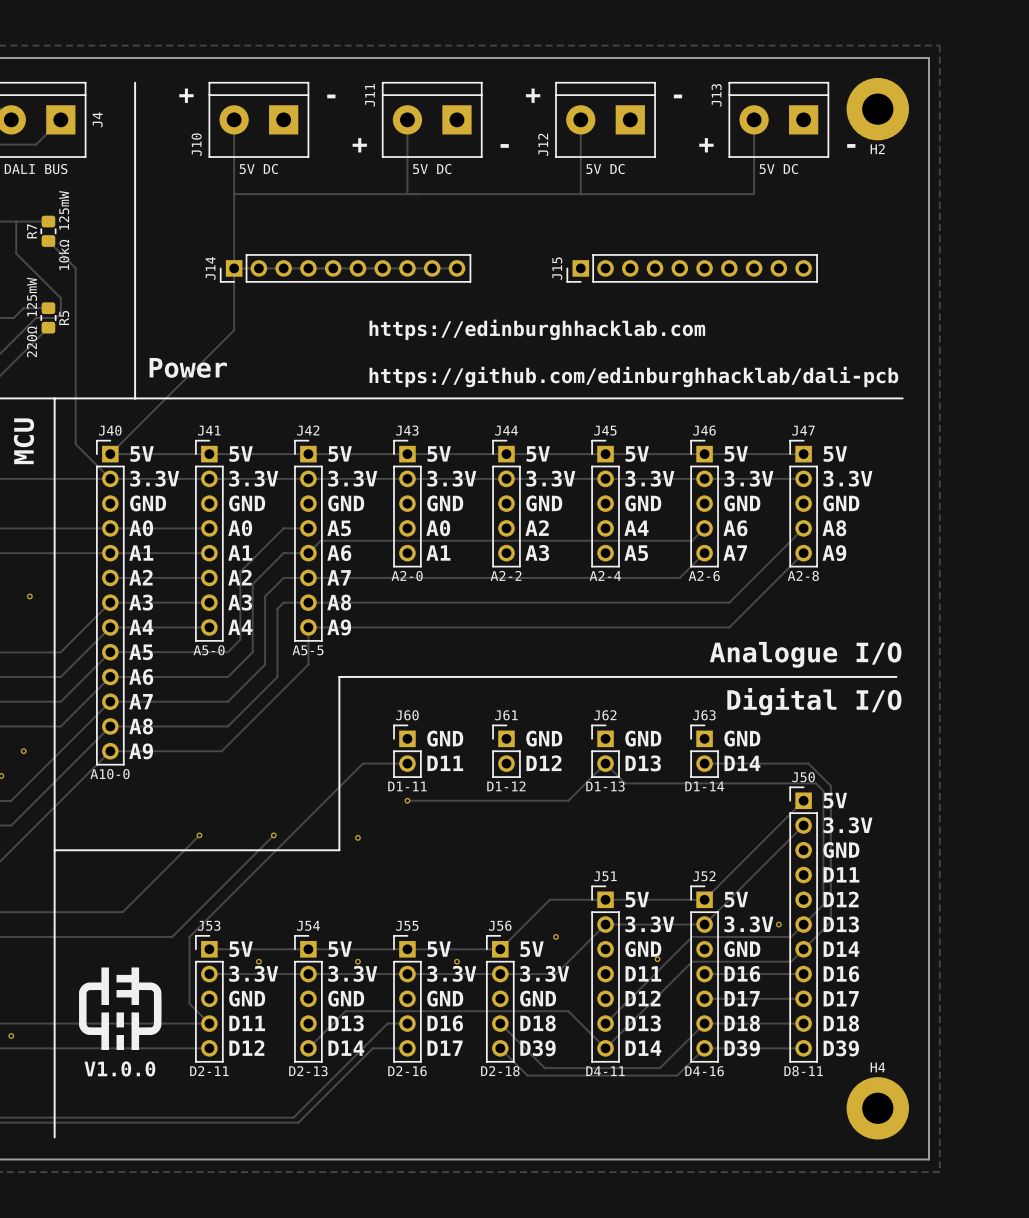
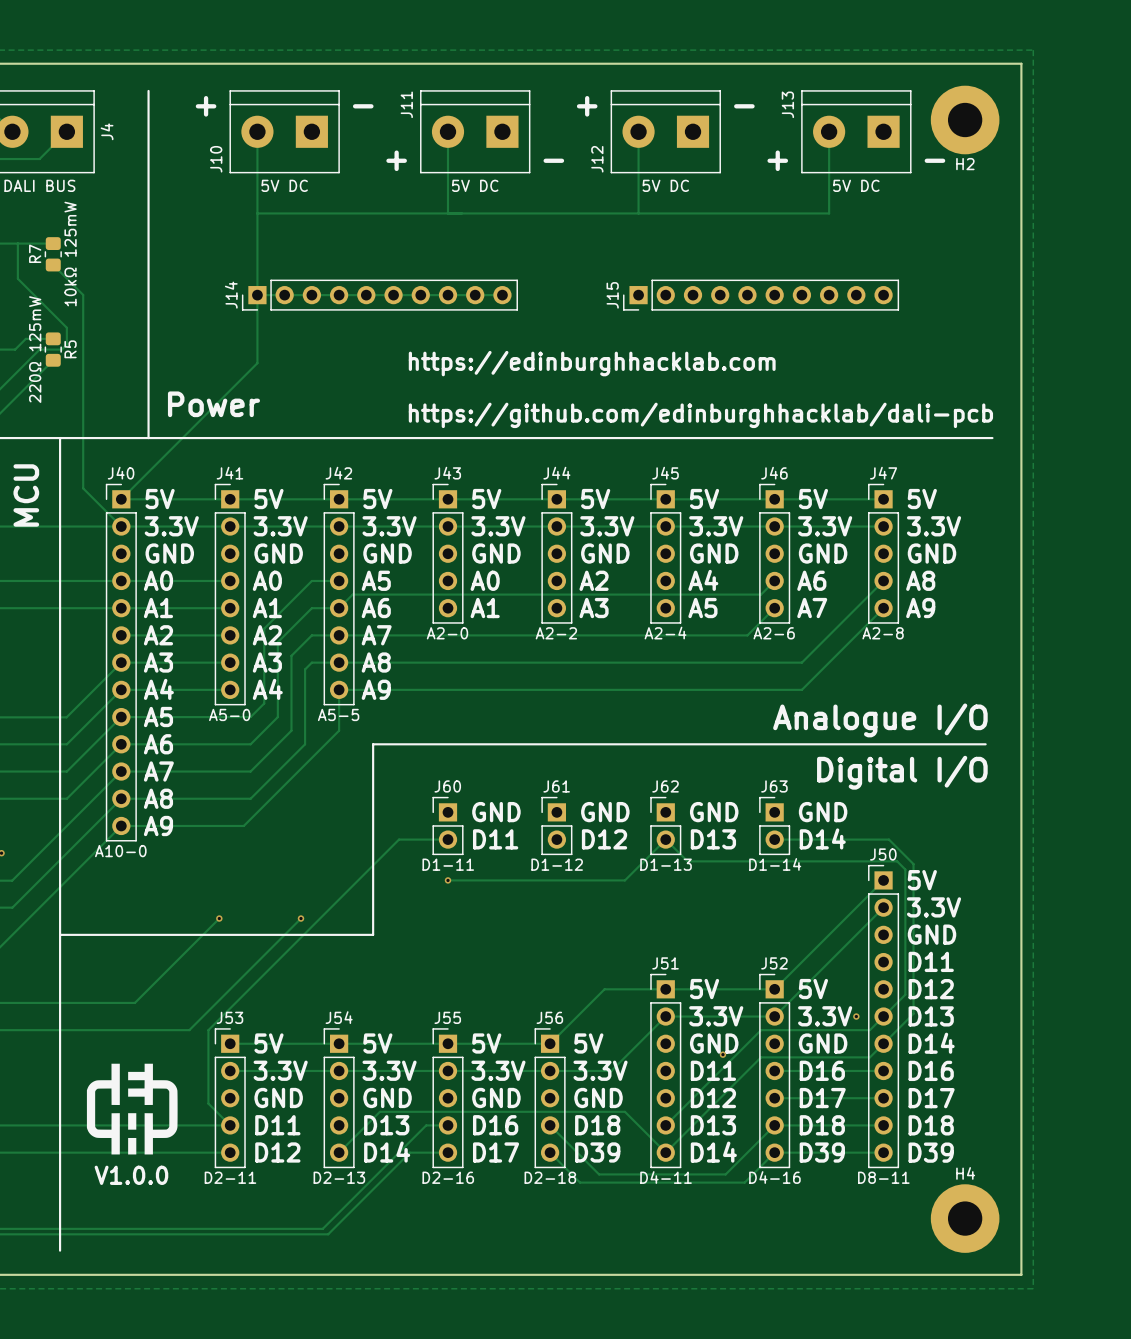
via: (29, 596) -> none
via: (23, 751) -> none
via: (357, 837) -> none
via: (556, 936) -> none
via: (258, 961) -> none
via: (357, 961) -> none
via: (456, 961) -> none
via: (11, 1035) -> none

